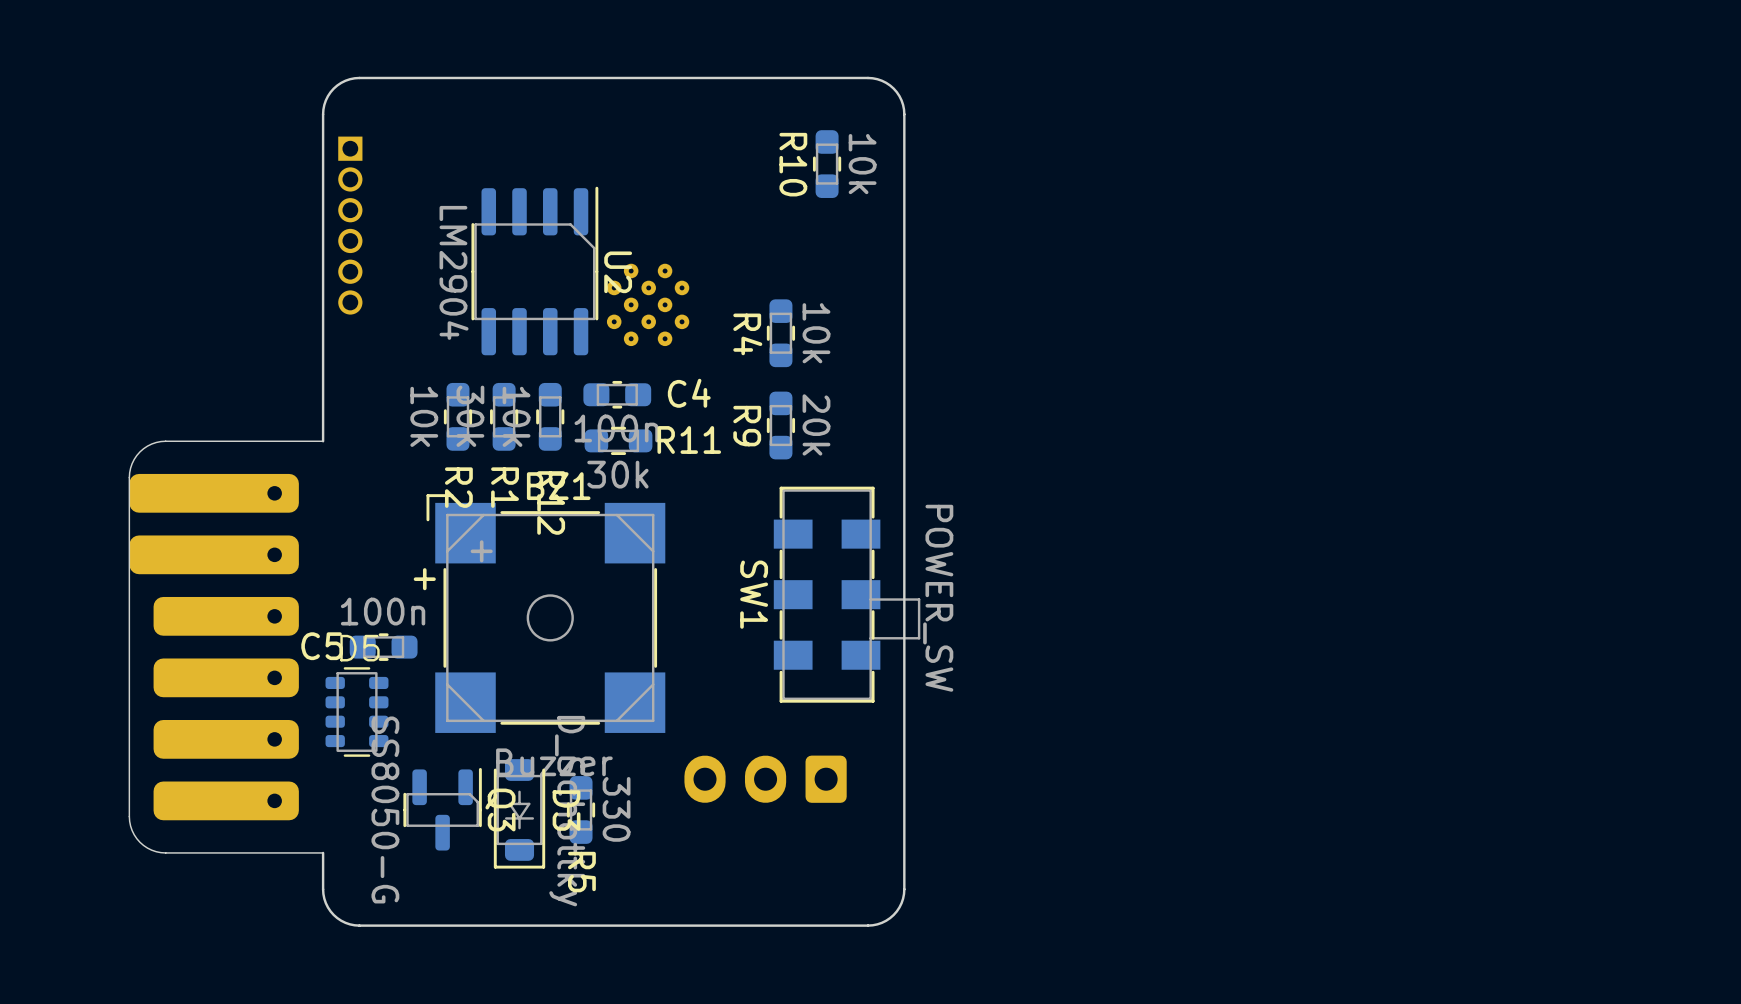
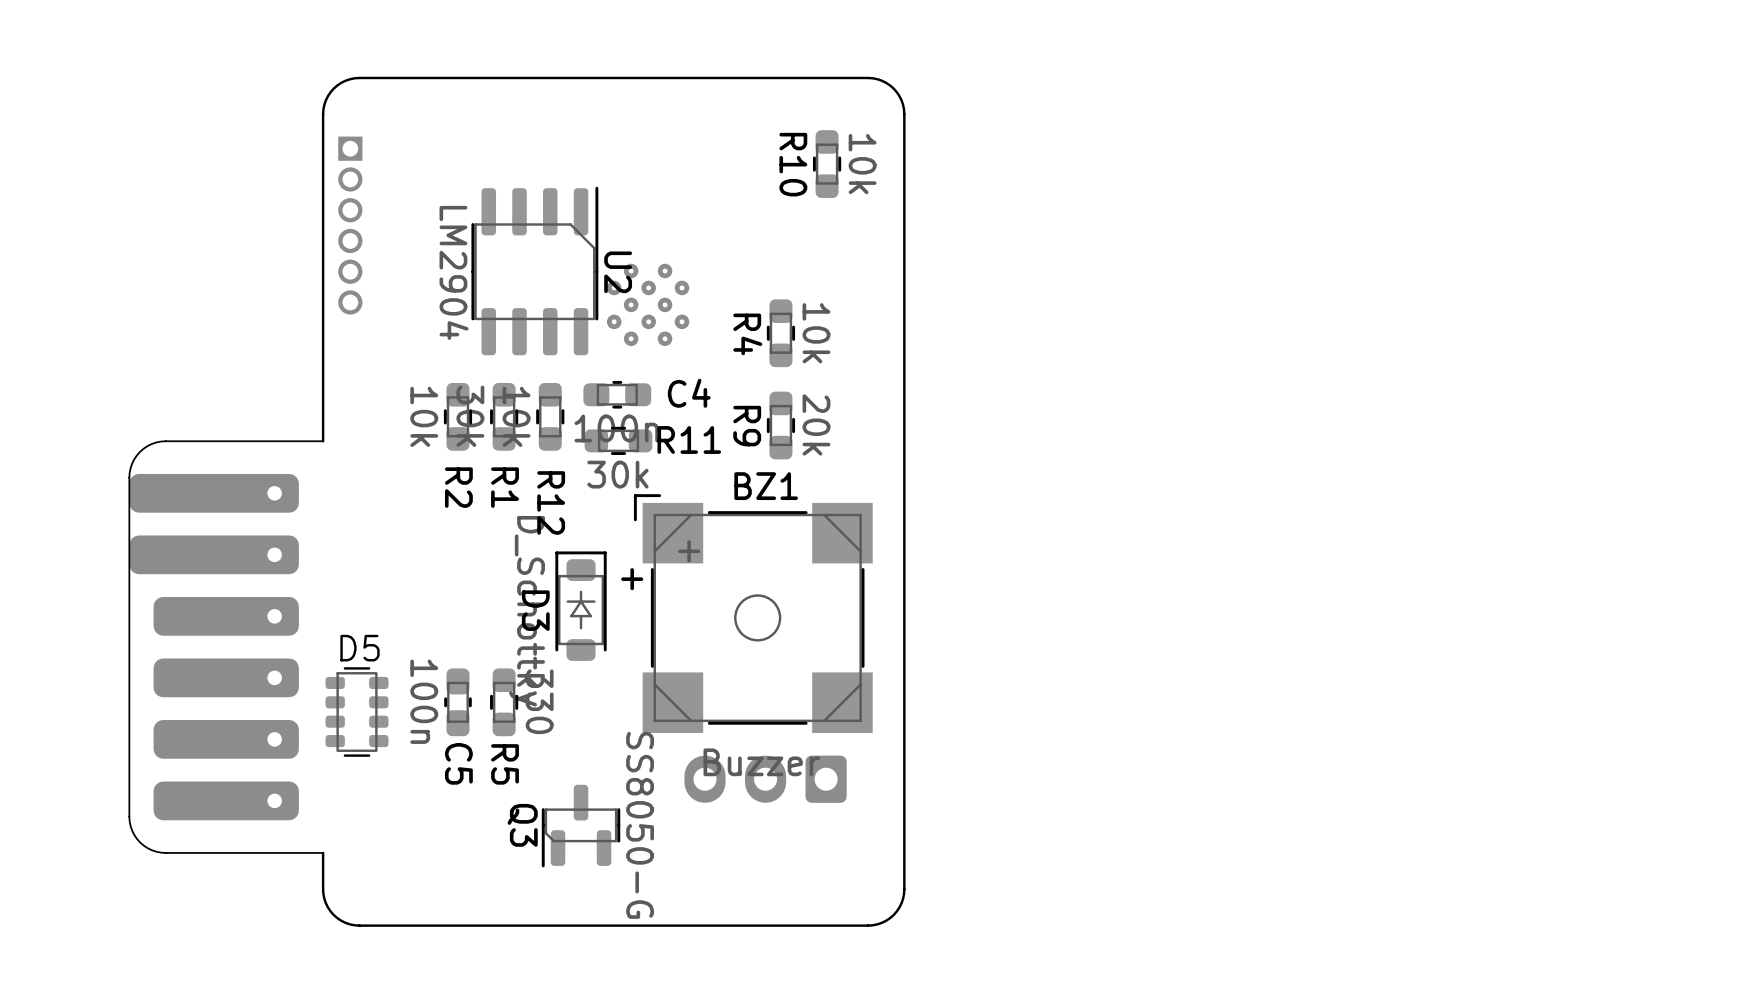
SW1: POWER_SW (847, 594) -> none
C5 value position: 100n (383, 611) -> 100n (424, 701)
BZ1 position: (545, 613) -> (753, 613)
C5 name position: C5 (322, 646) -> C5 (458, 763)
C5 rotation: 0° (383, 647) -> 90° clockwise (457, 702)
C5 position: (383, 647) -> (457, 702)
Q3 rotation: 0° (442, 809) -> 180° (581, 826)
Q3 position: (442, 809) -> (581, 826)
R5 position: (581, 809) -> (504, 702)
D3 rotation: 0° (519, 813) -> 180° (581, 606)
D3 position: (519, 813) -> (581, 606)

